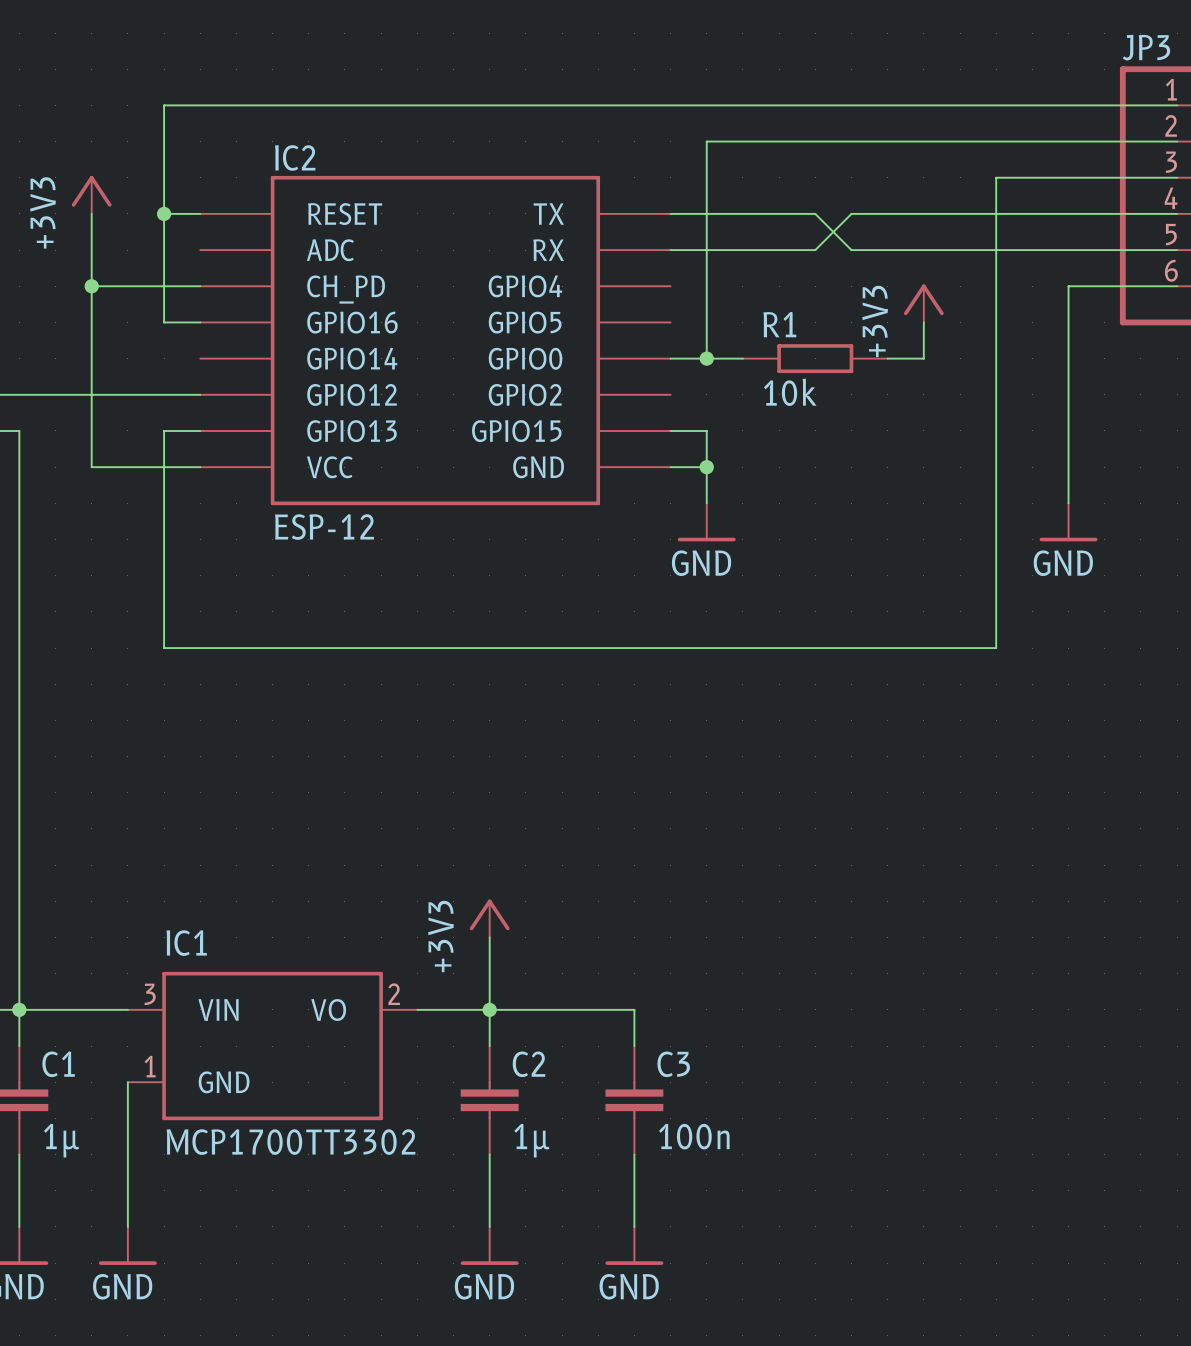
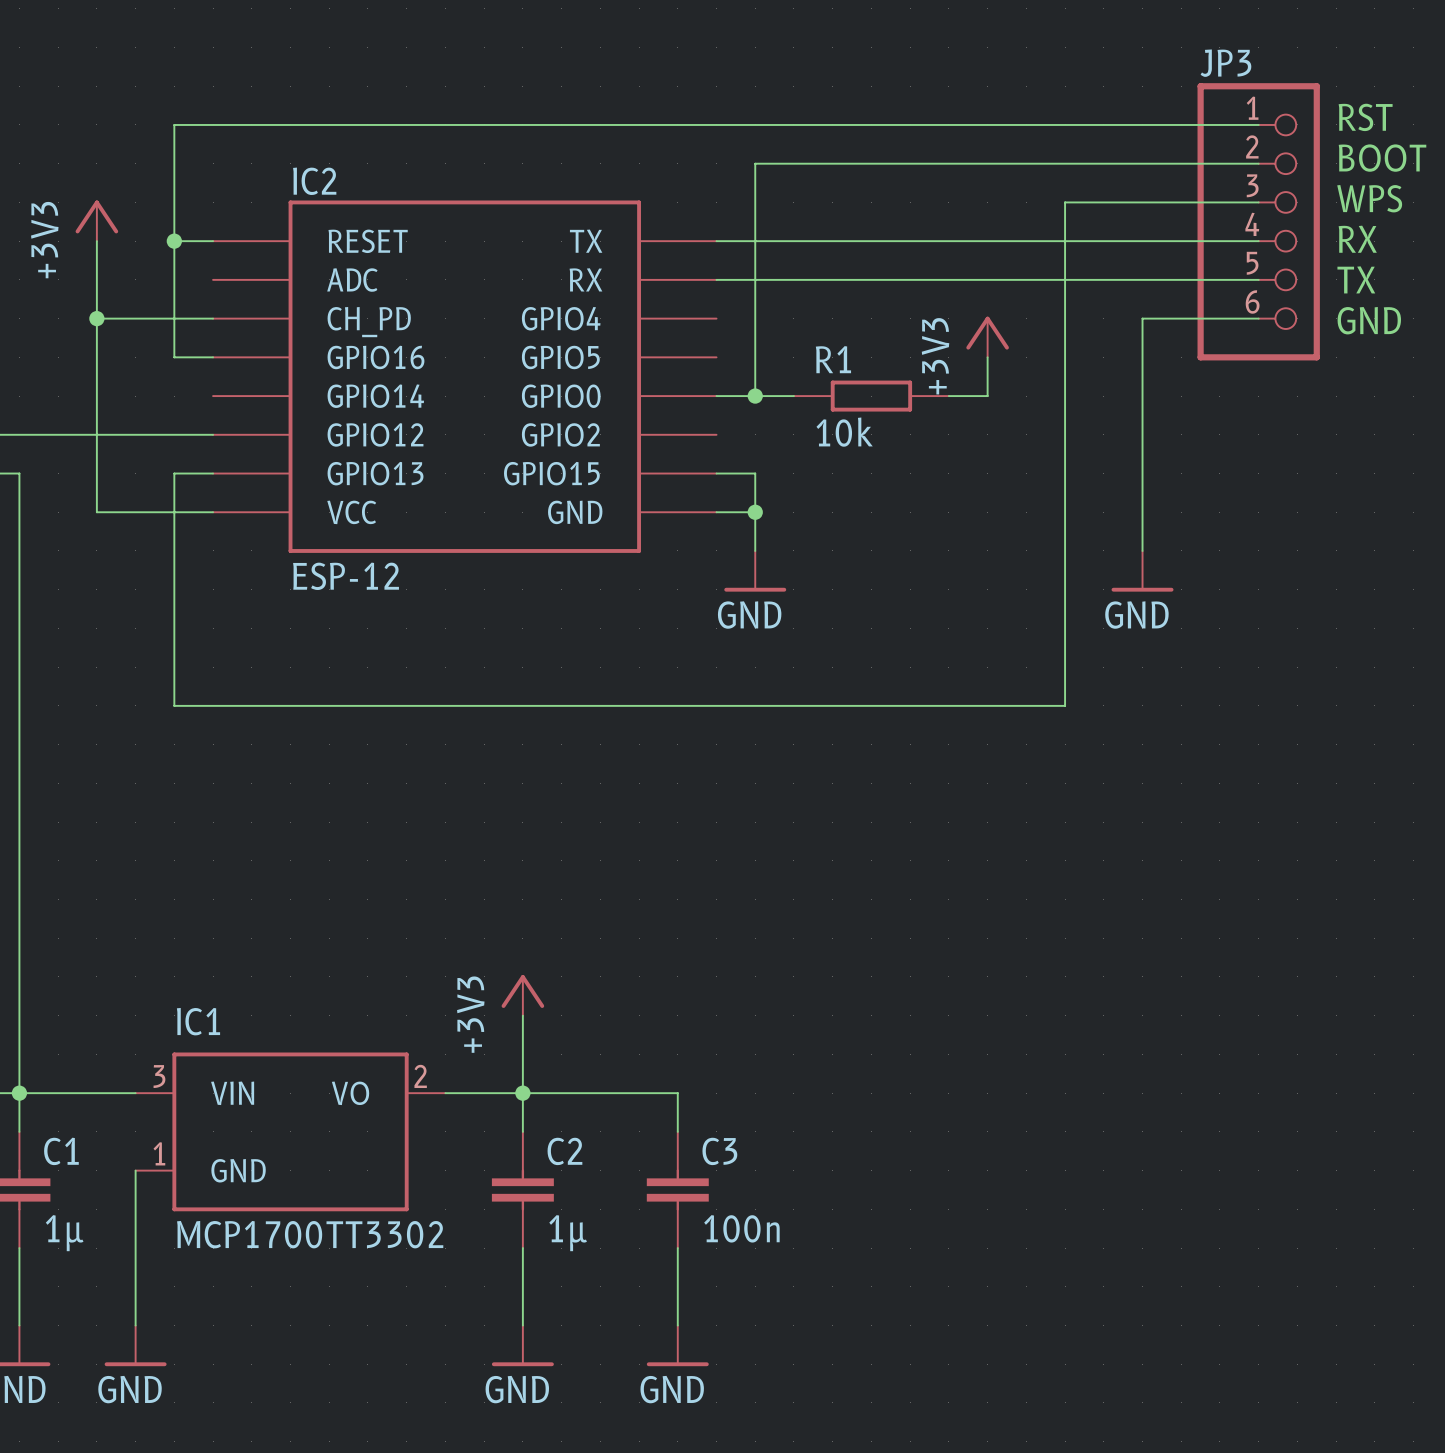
wire: (815, 213) (851, 250) -> (871, 241) (910, 241)
wire: (851, 213) (815, 250) -> (910, 279) (871, 279)

